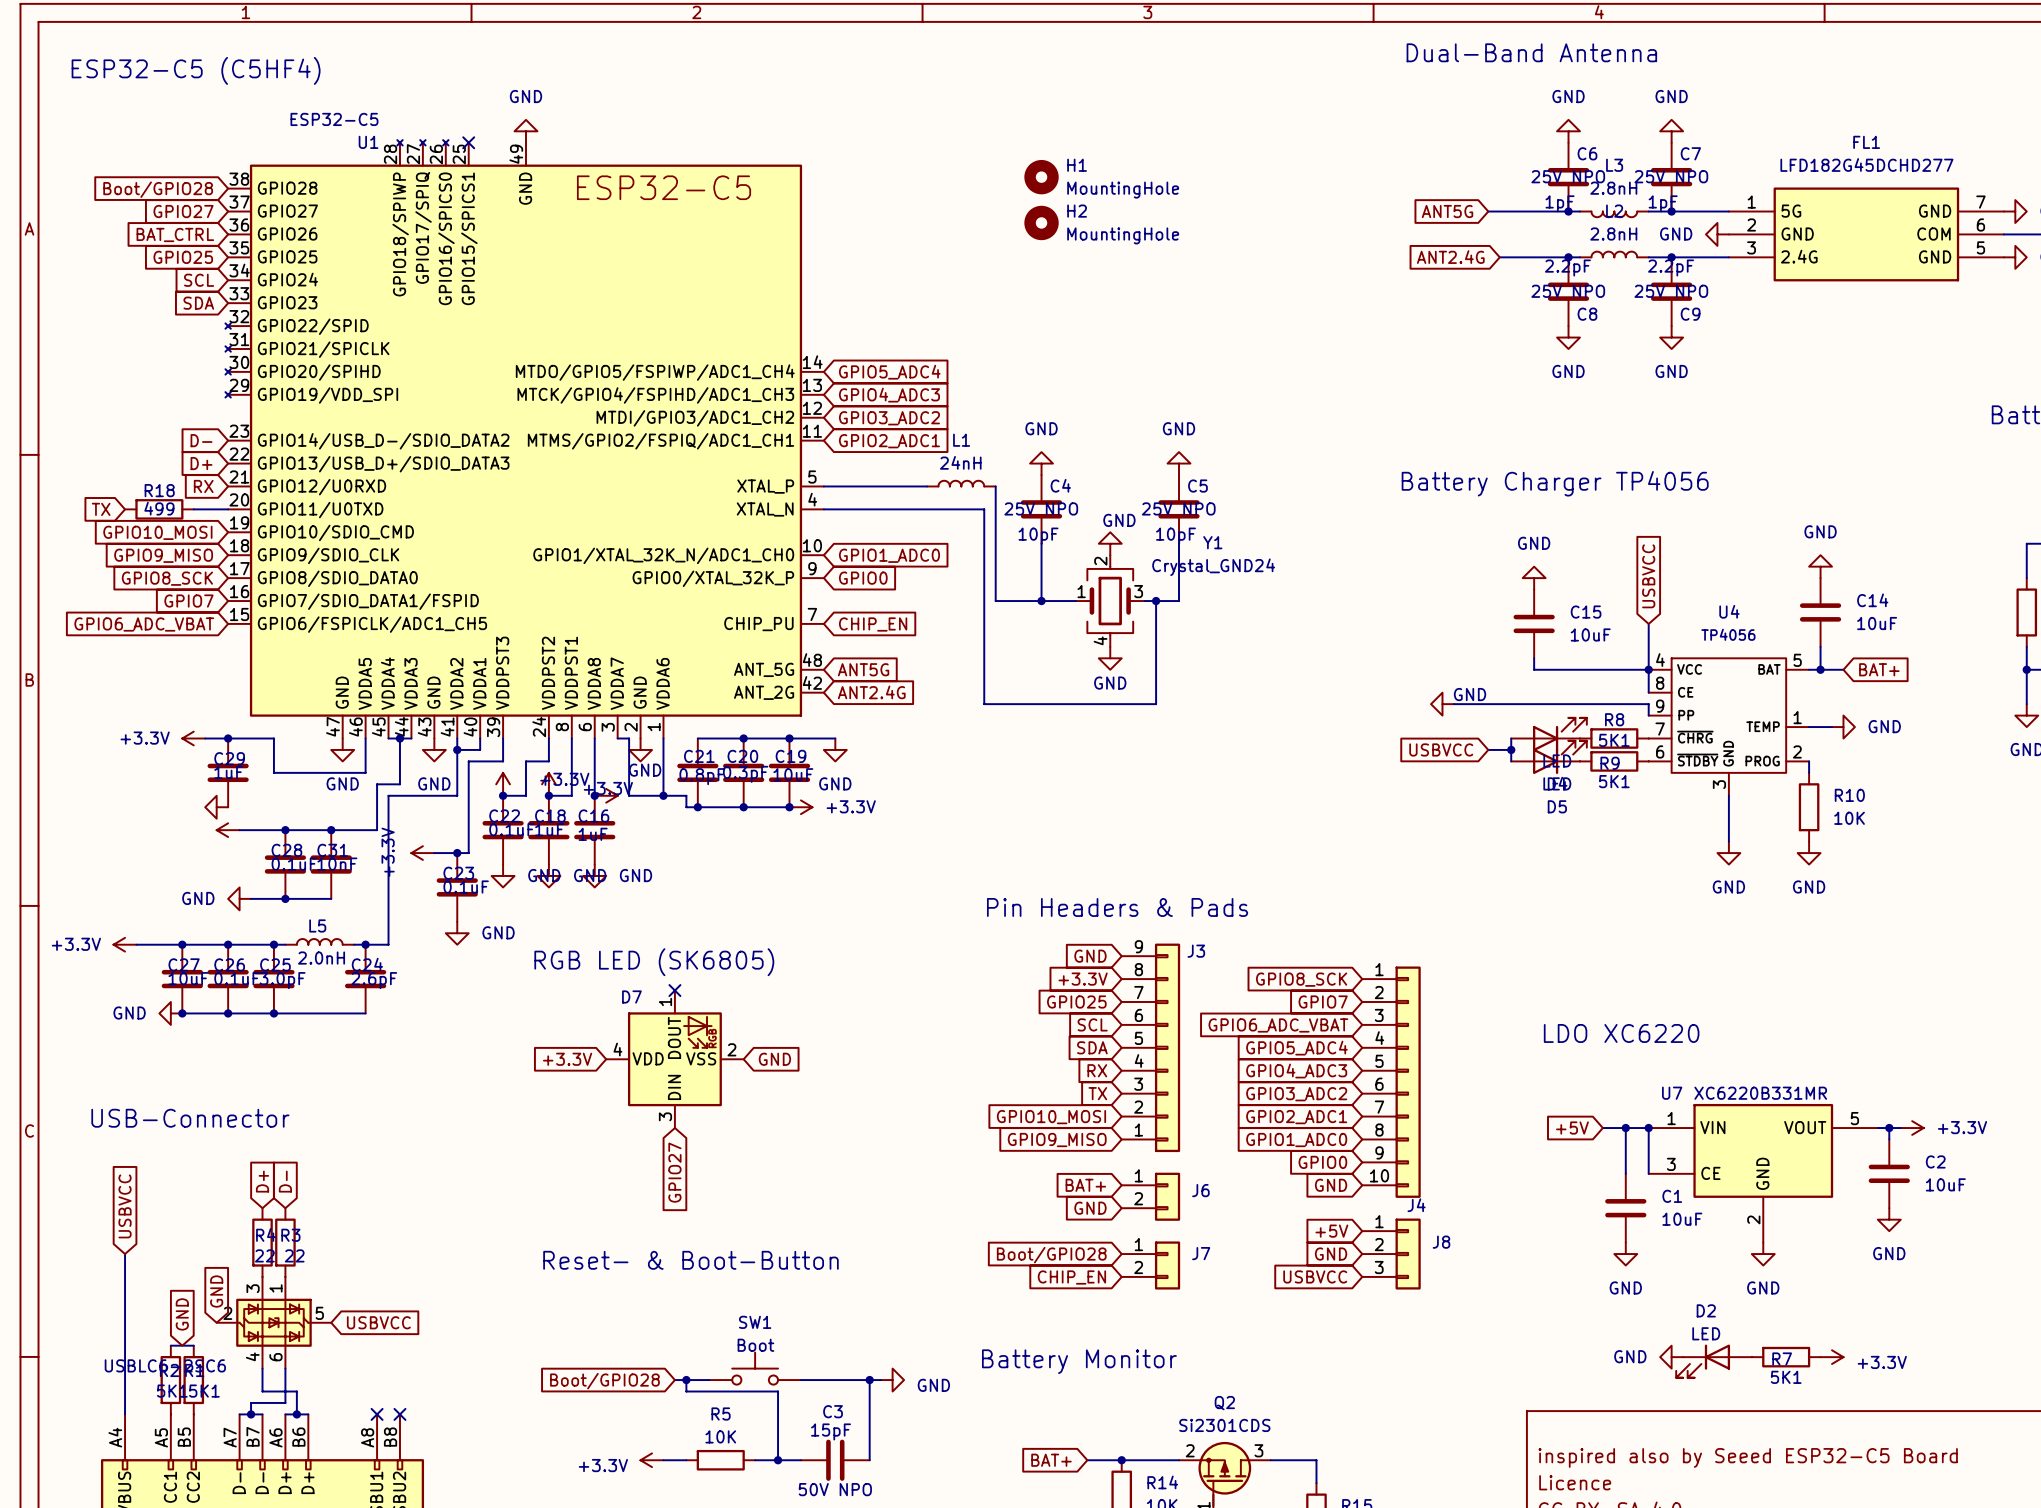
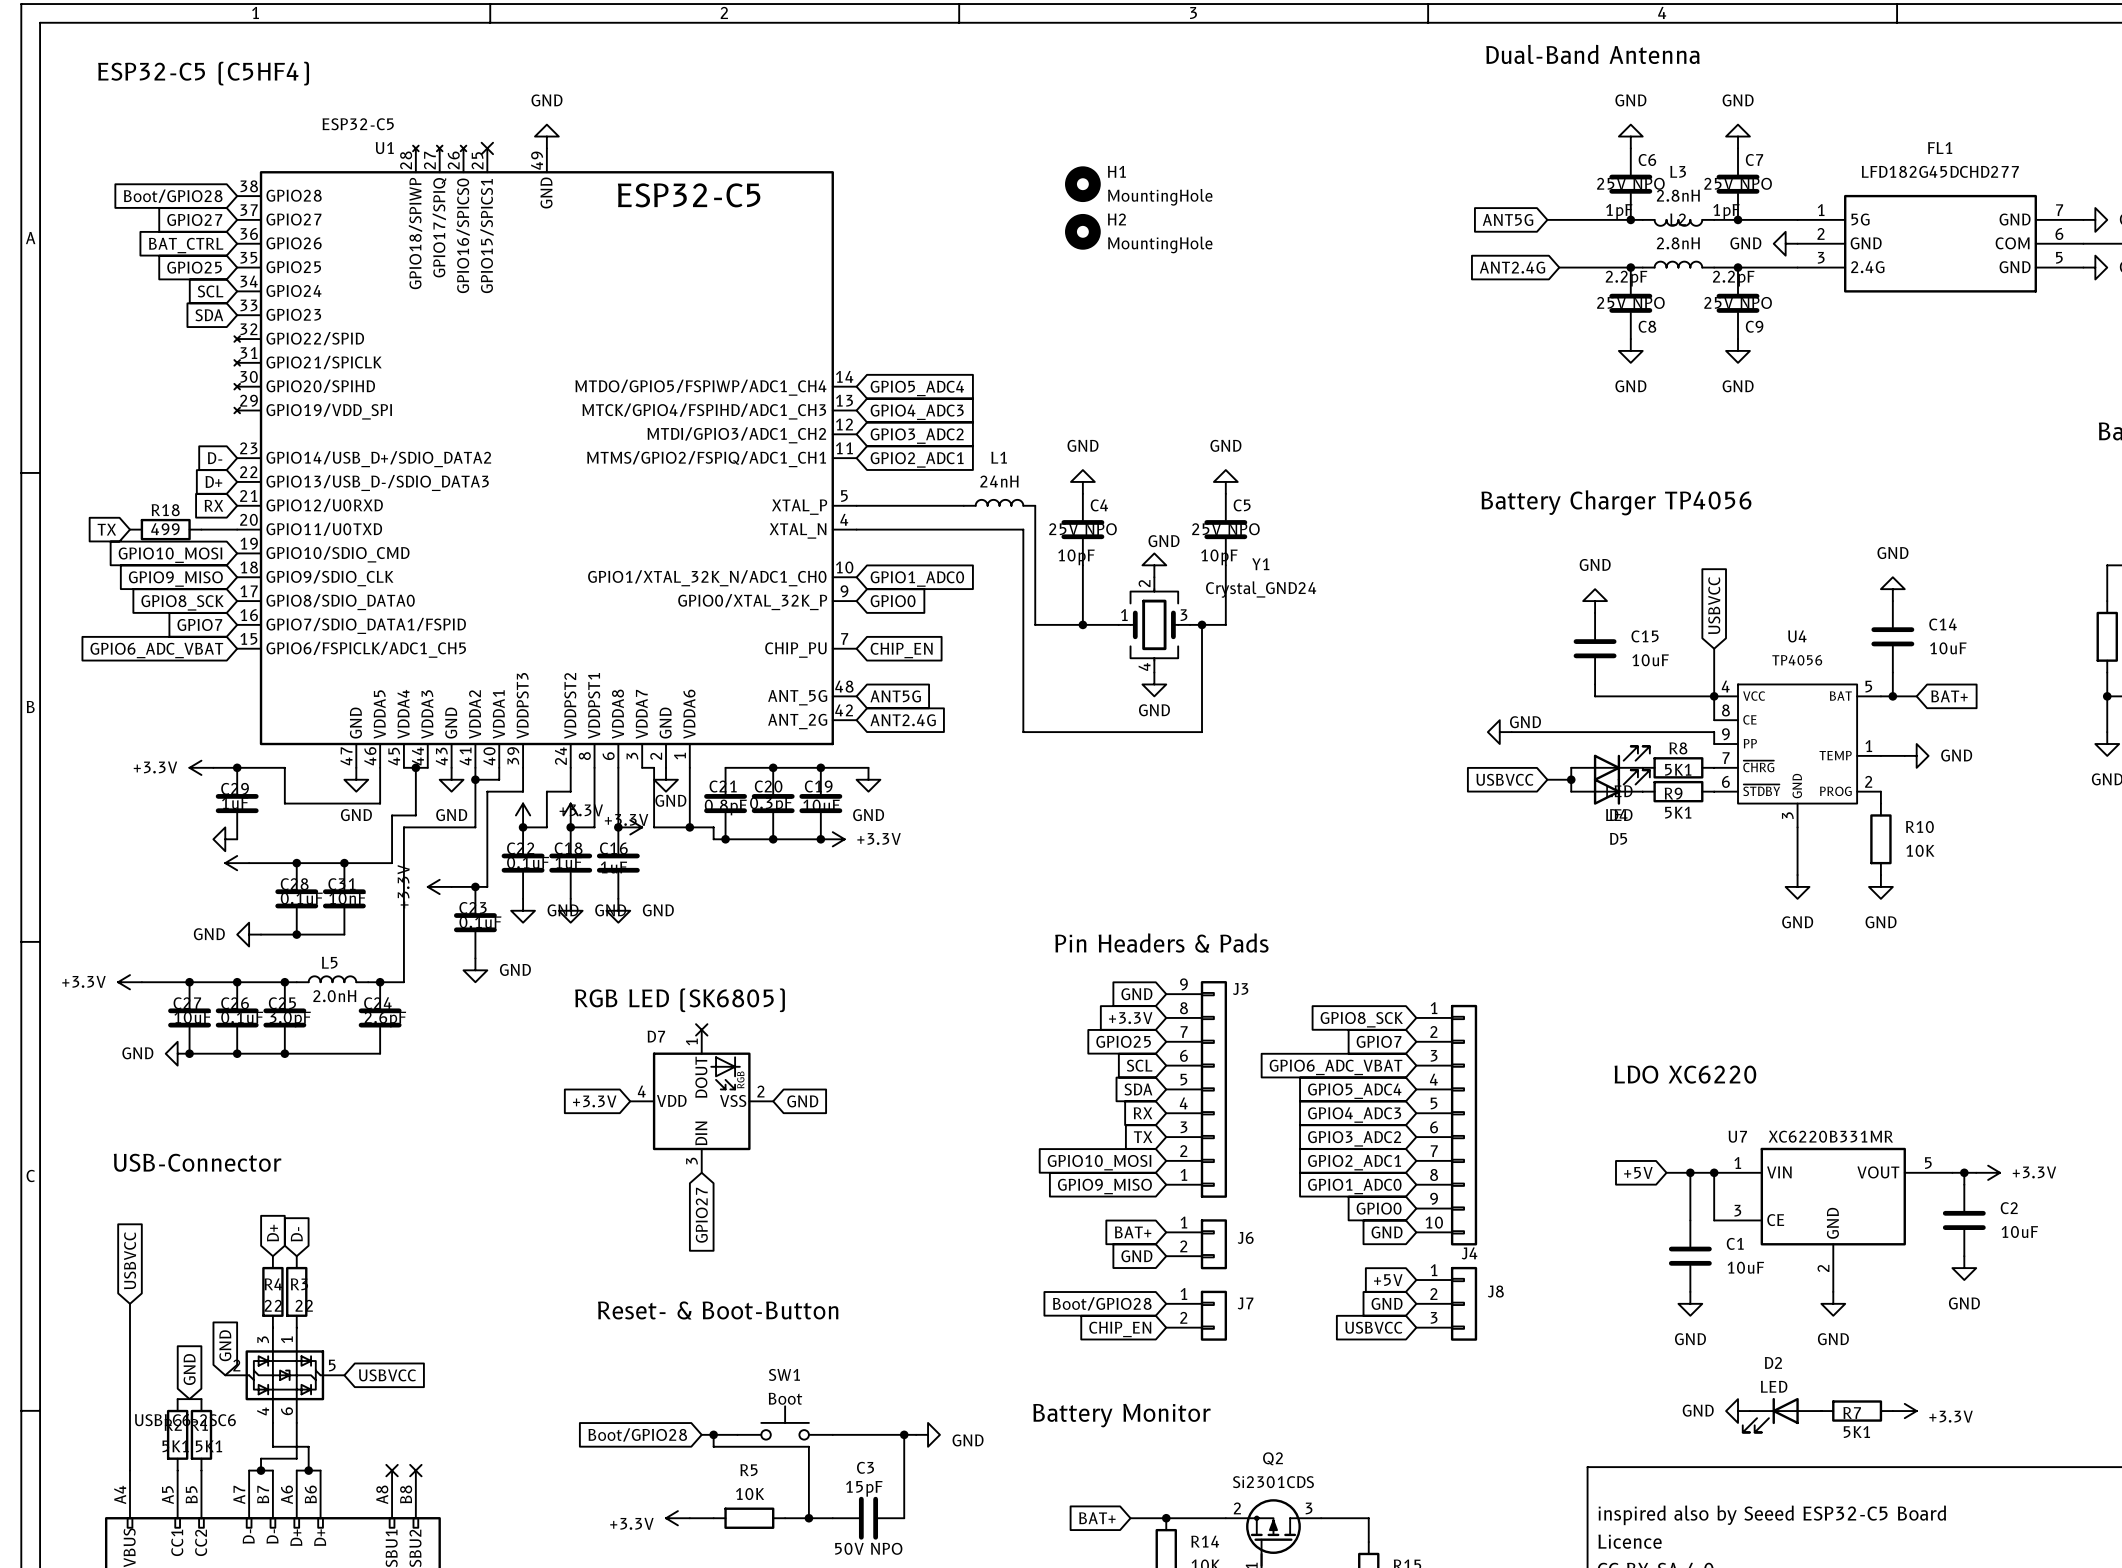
U1 pin name: GPIO14/USB_D-/SDIO_DATA2 (383, 441) -> GPIO14/USB_D+/SDIO_DATA2 (378, 459)
U1 pin name: GPIO13/USB_D+/SDIO_DATA3 (383, 464) -> GPIO13/USB_D-/SDIO_DATA3 (377, 482)

